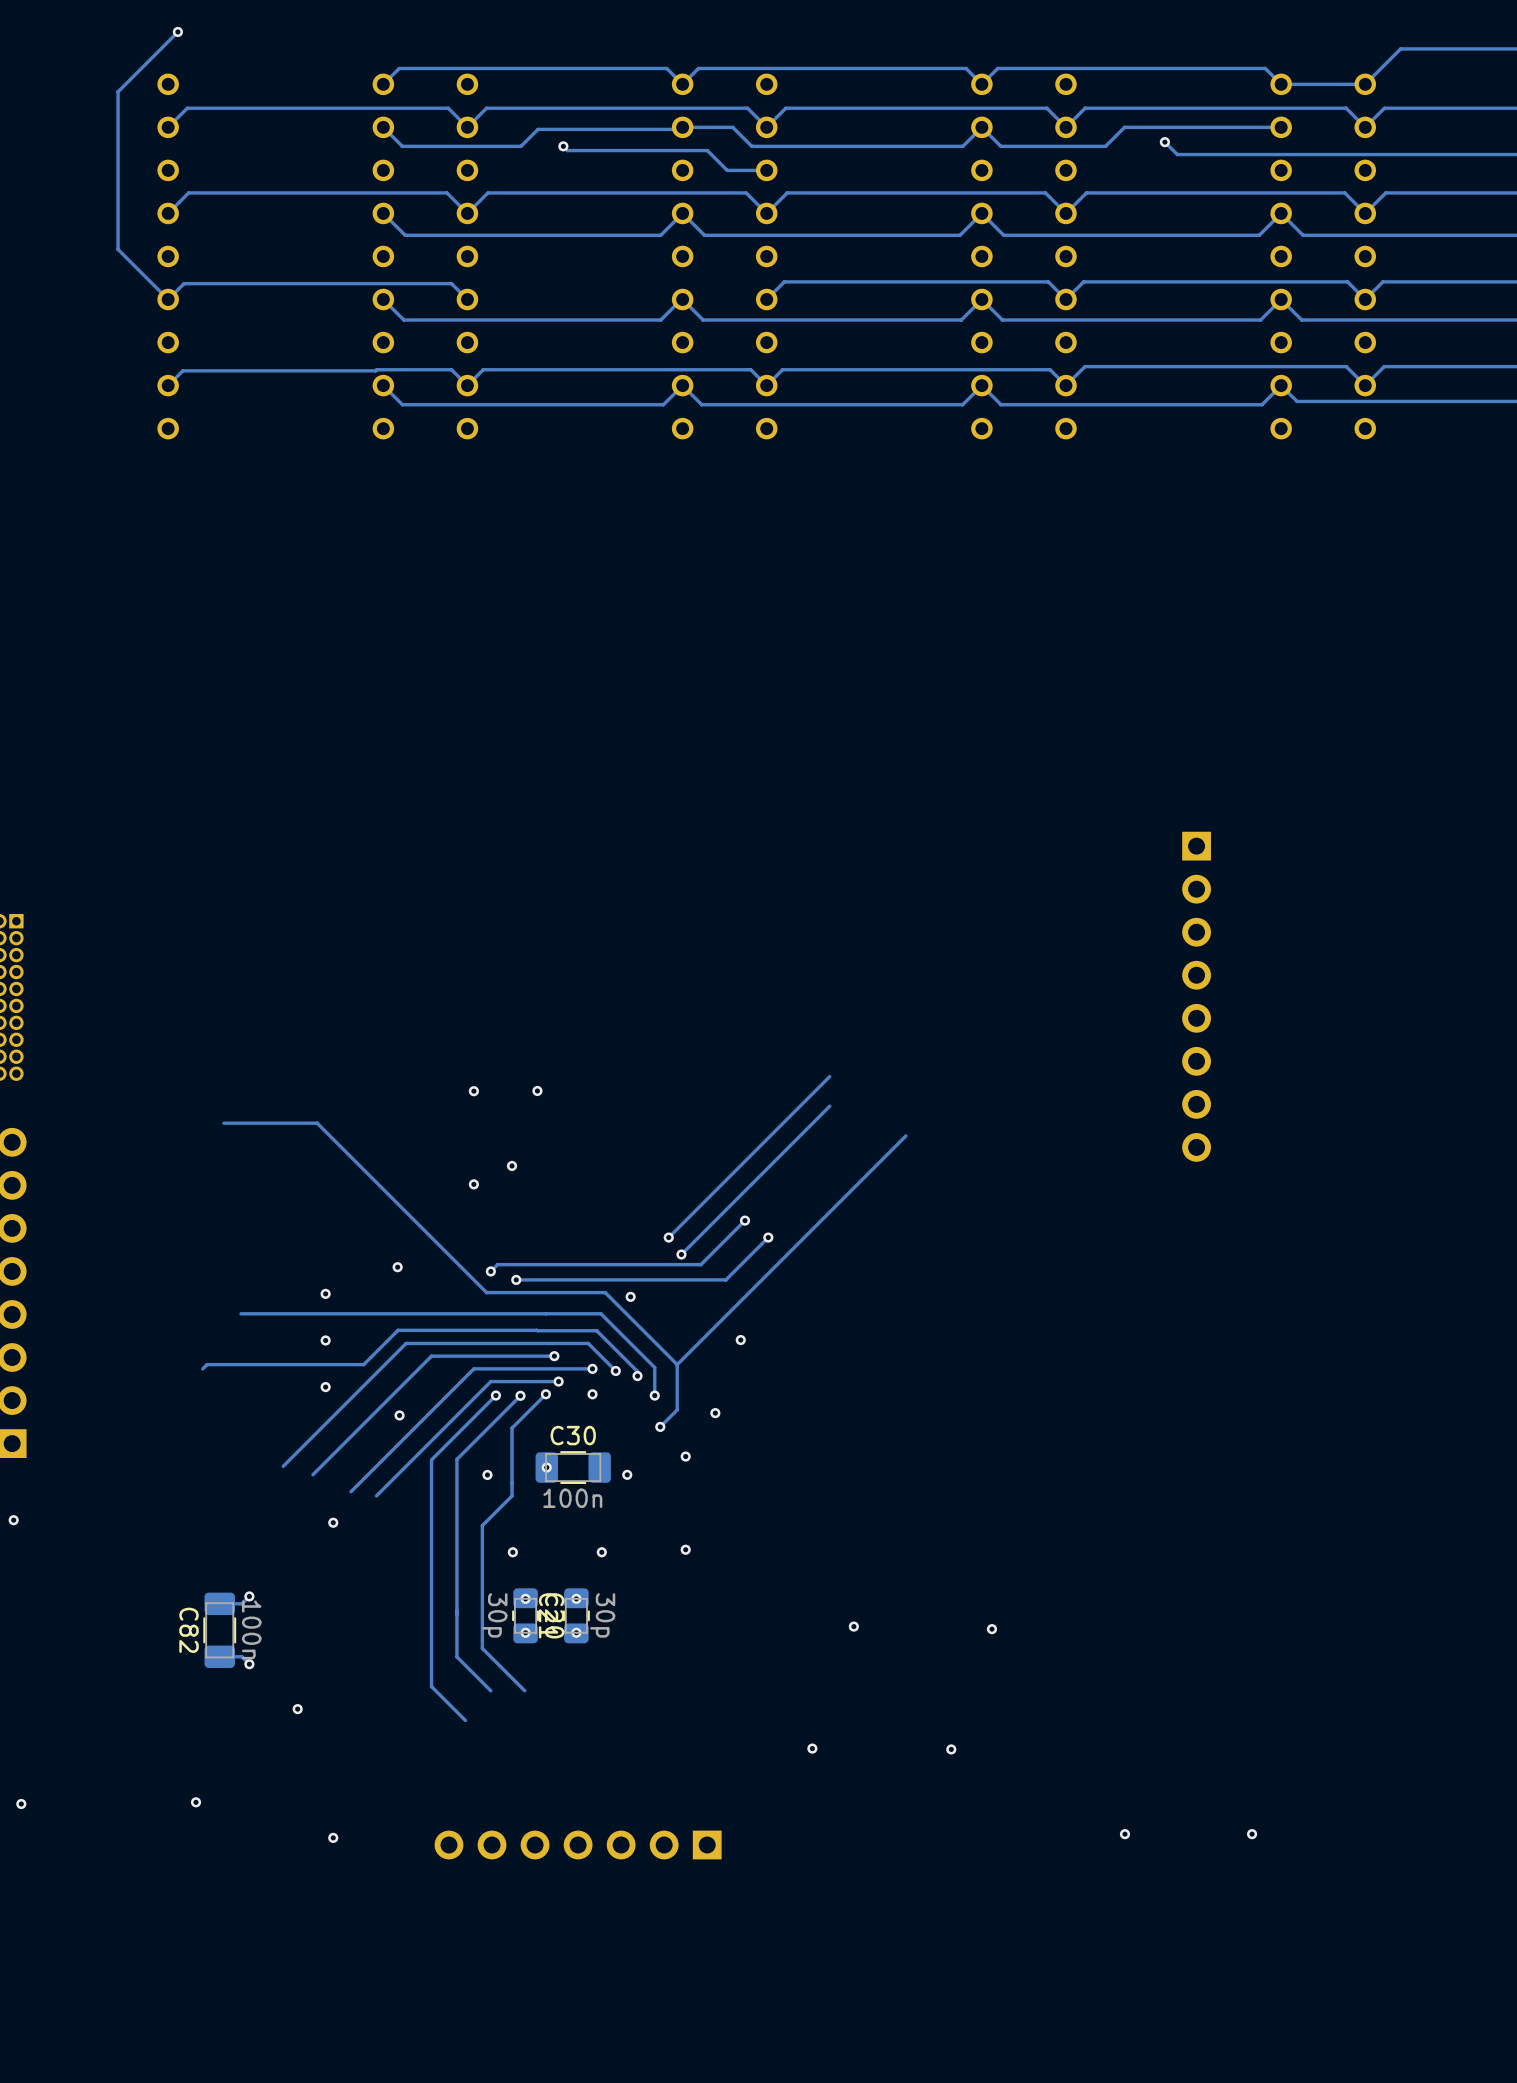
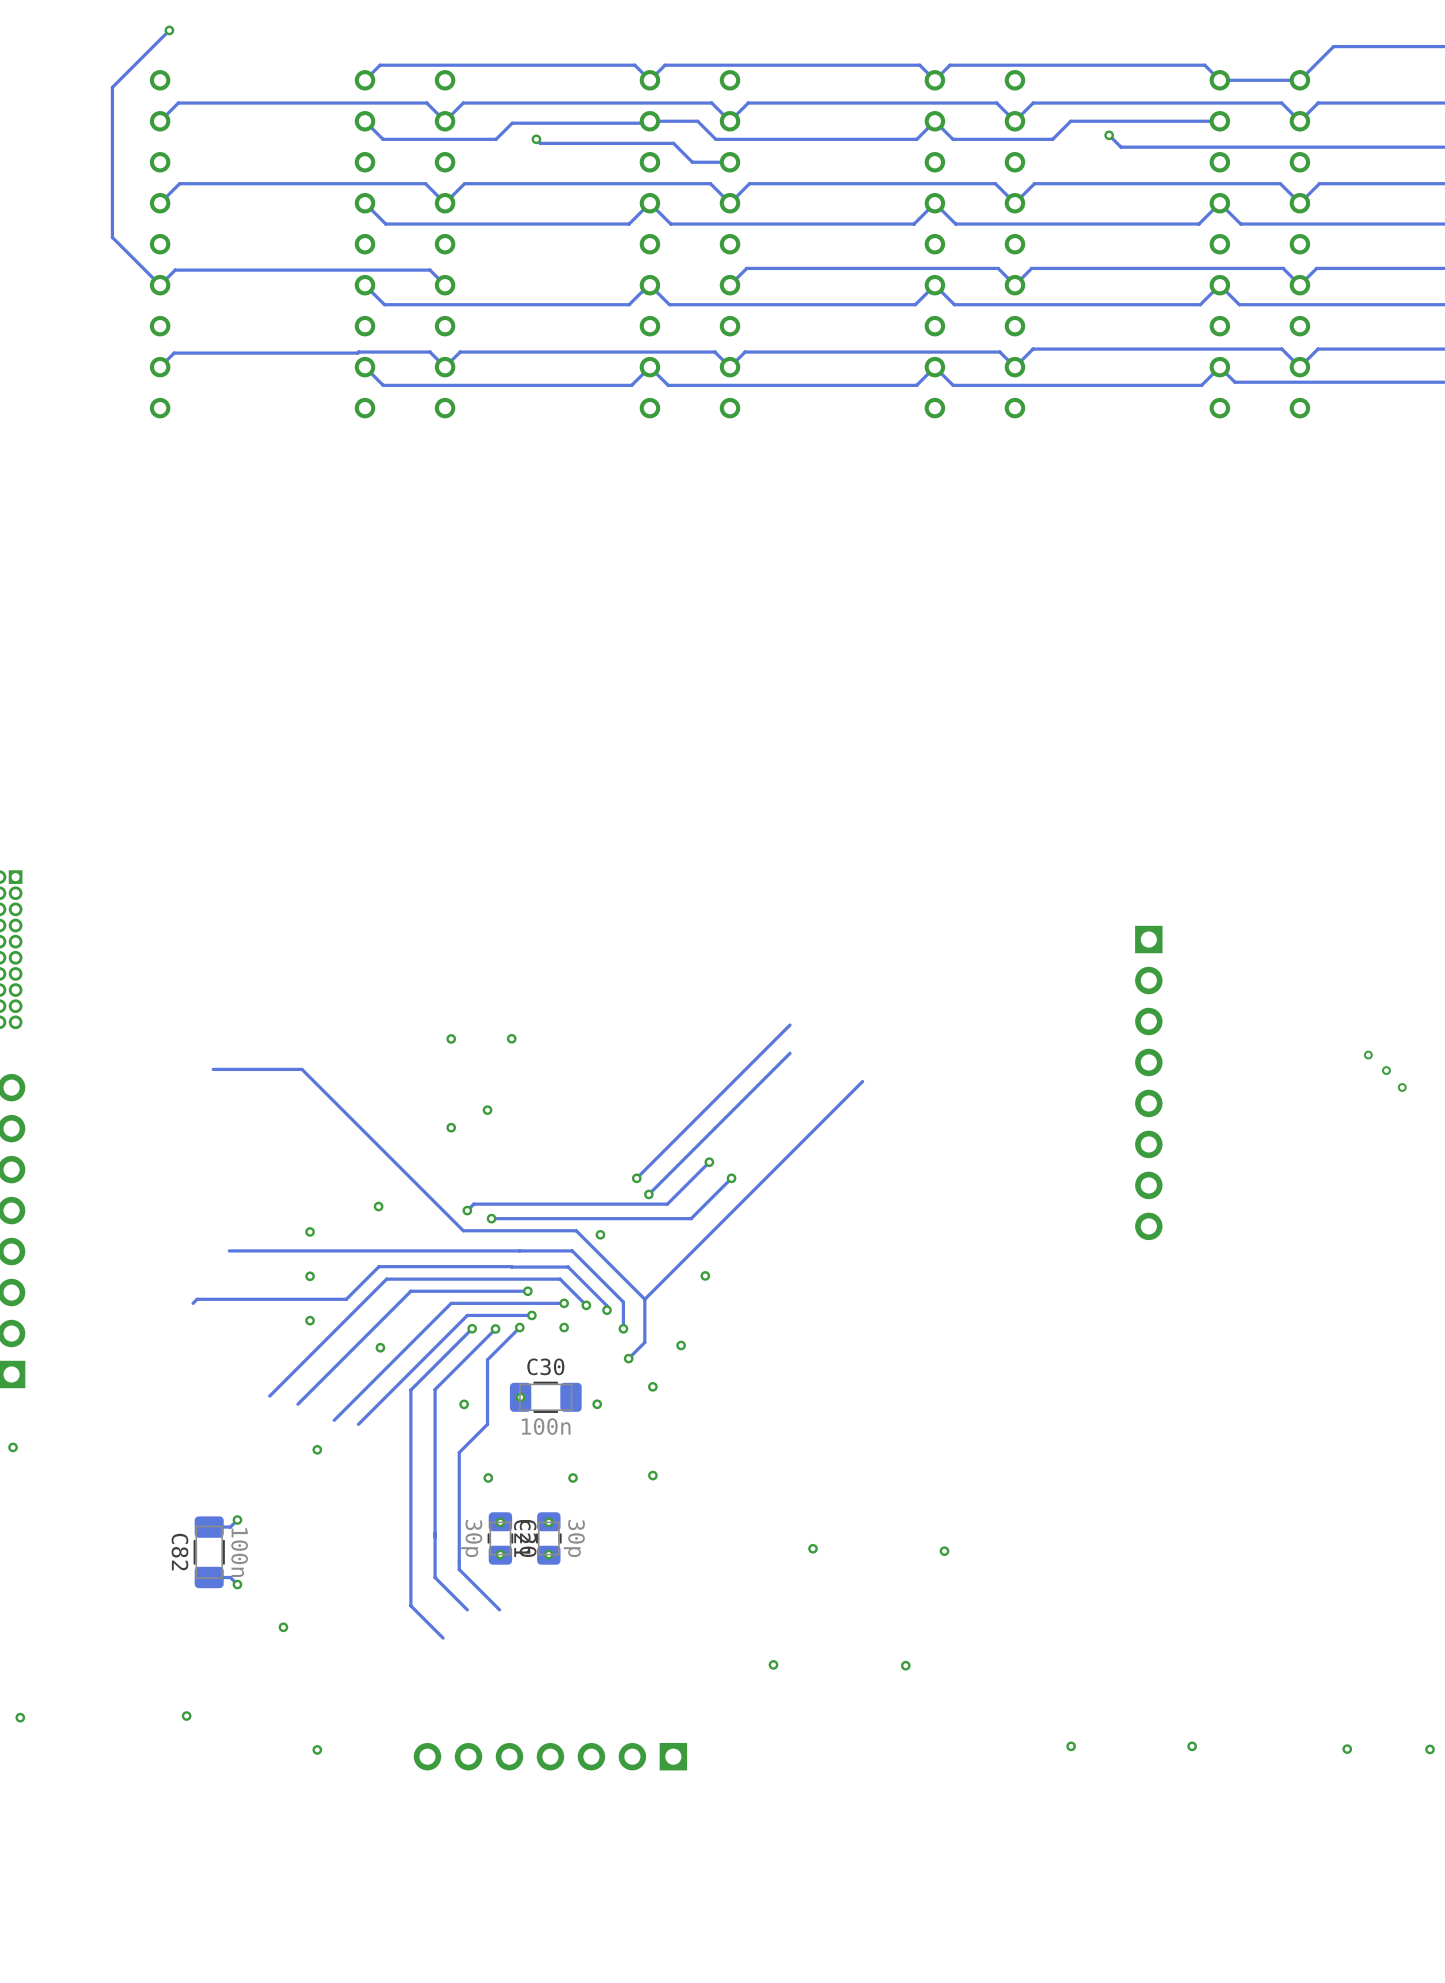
part position: (1196, 996) -> (1148, 1082)
via: none -> (1368, 1055)
via: none -> (1386, 1070)
via: none -> (1402, 1087)
via: none -> (1347, 1749)
via: none -> (1430, 1749)

